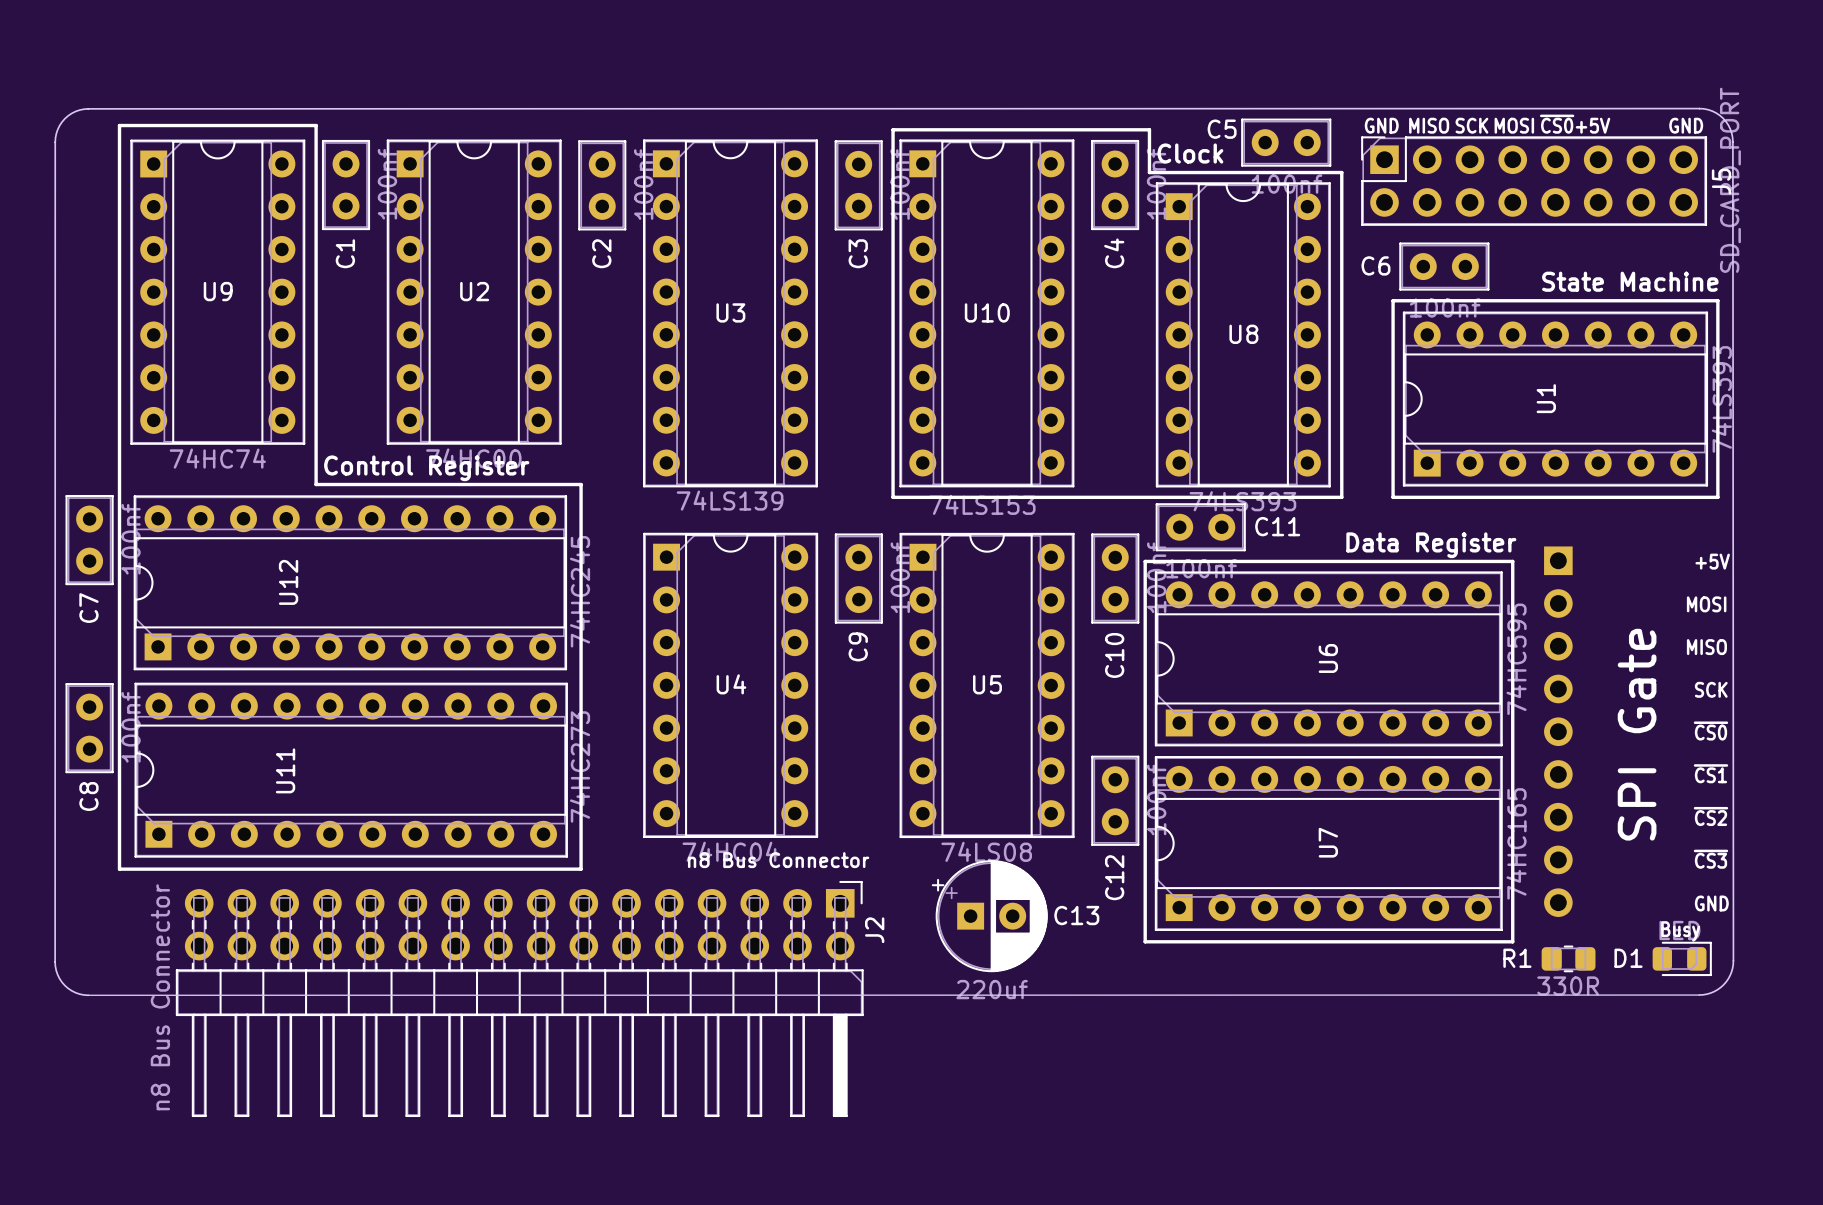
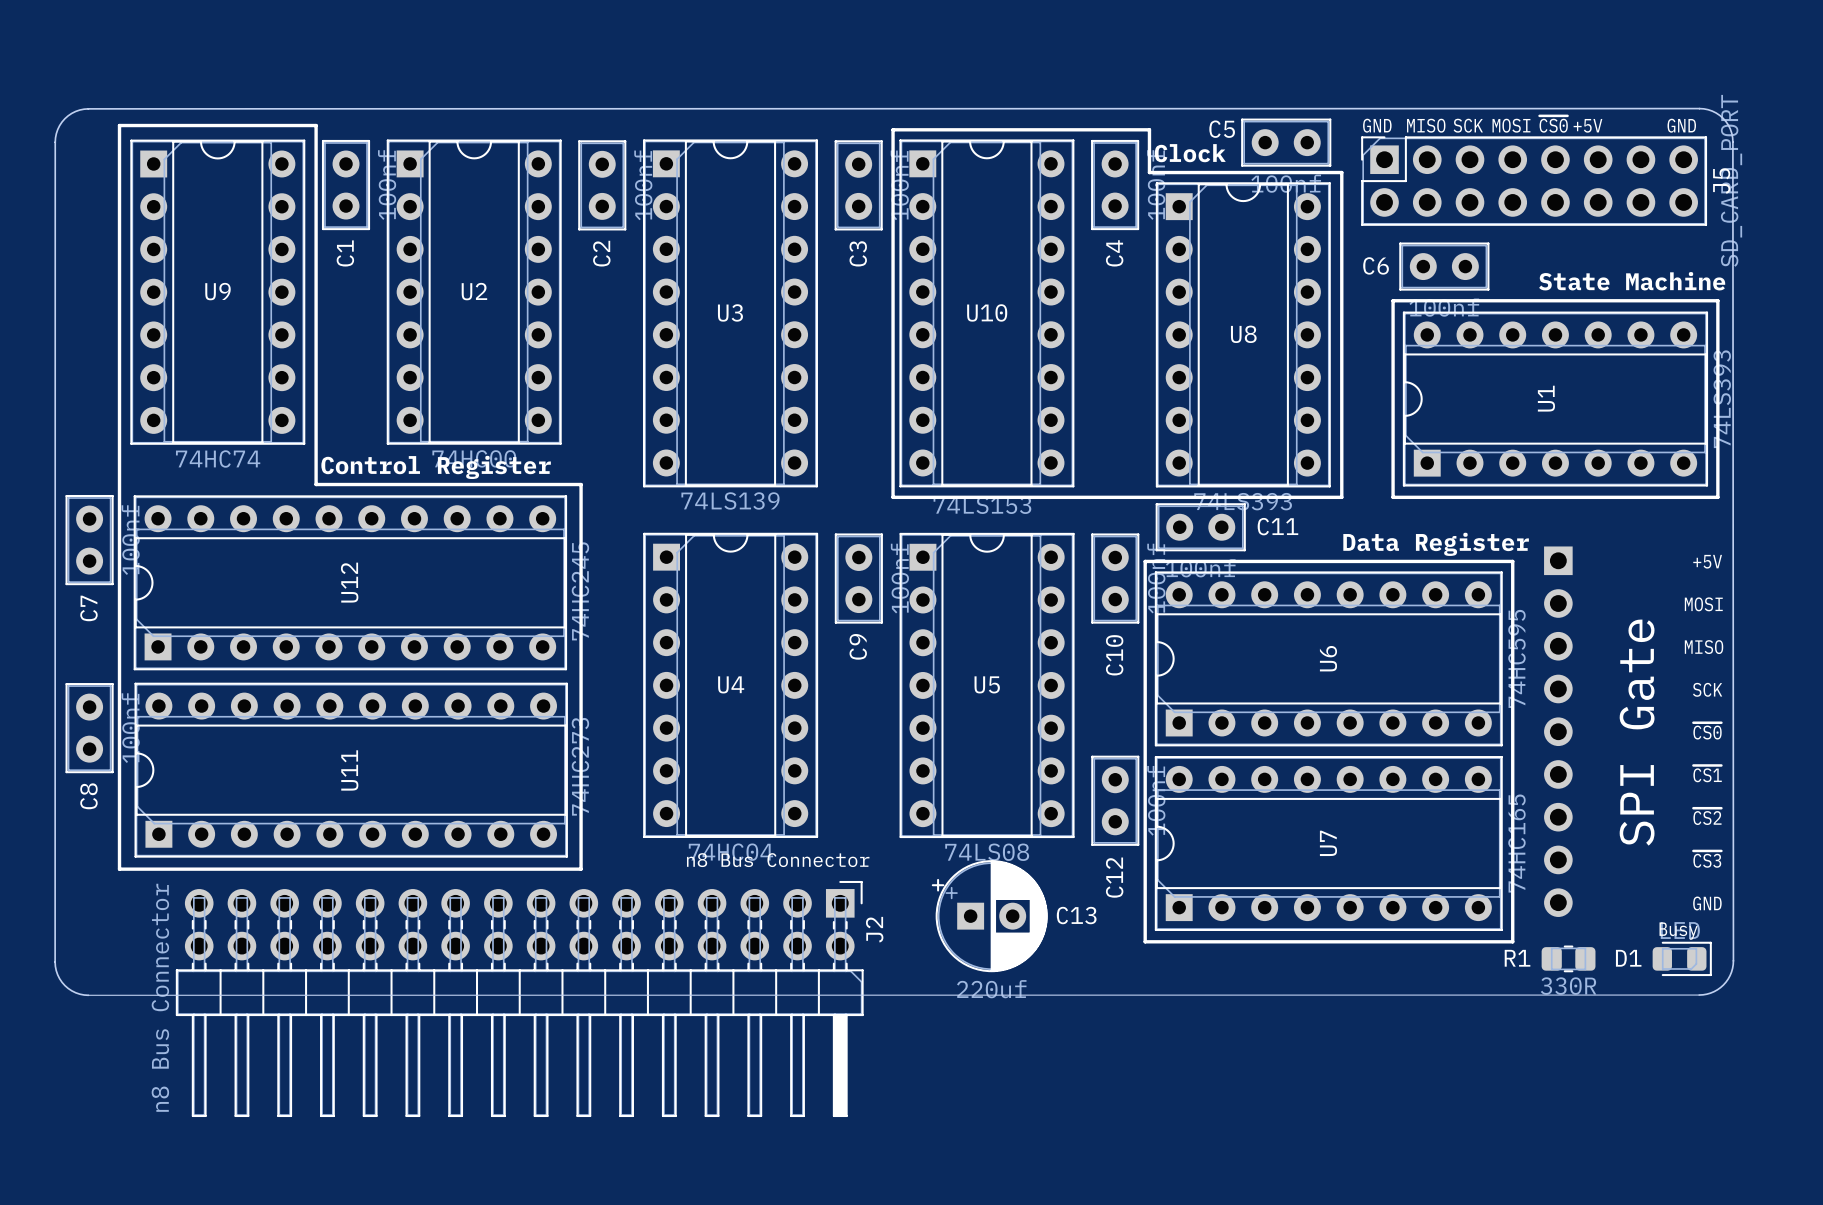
U12 name position: U12 (288, 582) -> U12 (349, 582)
U11 name position: U11 (285, 770) -> U11 (349, 770)

